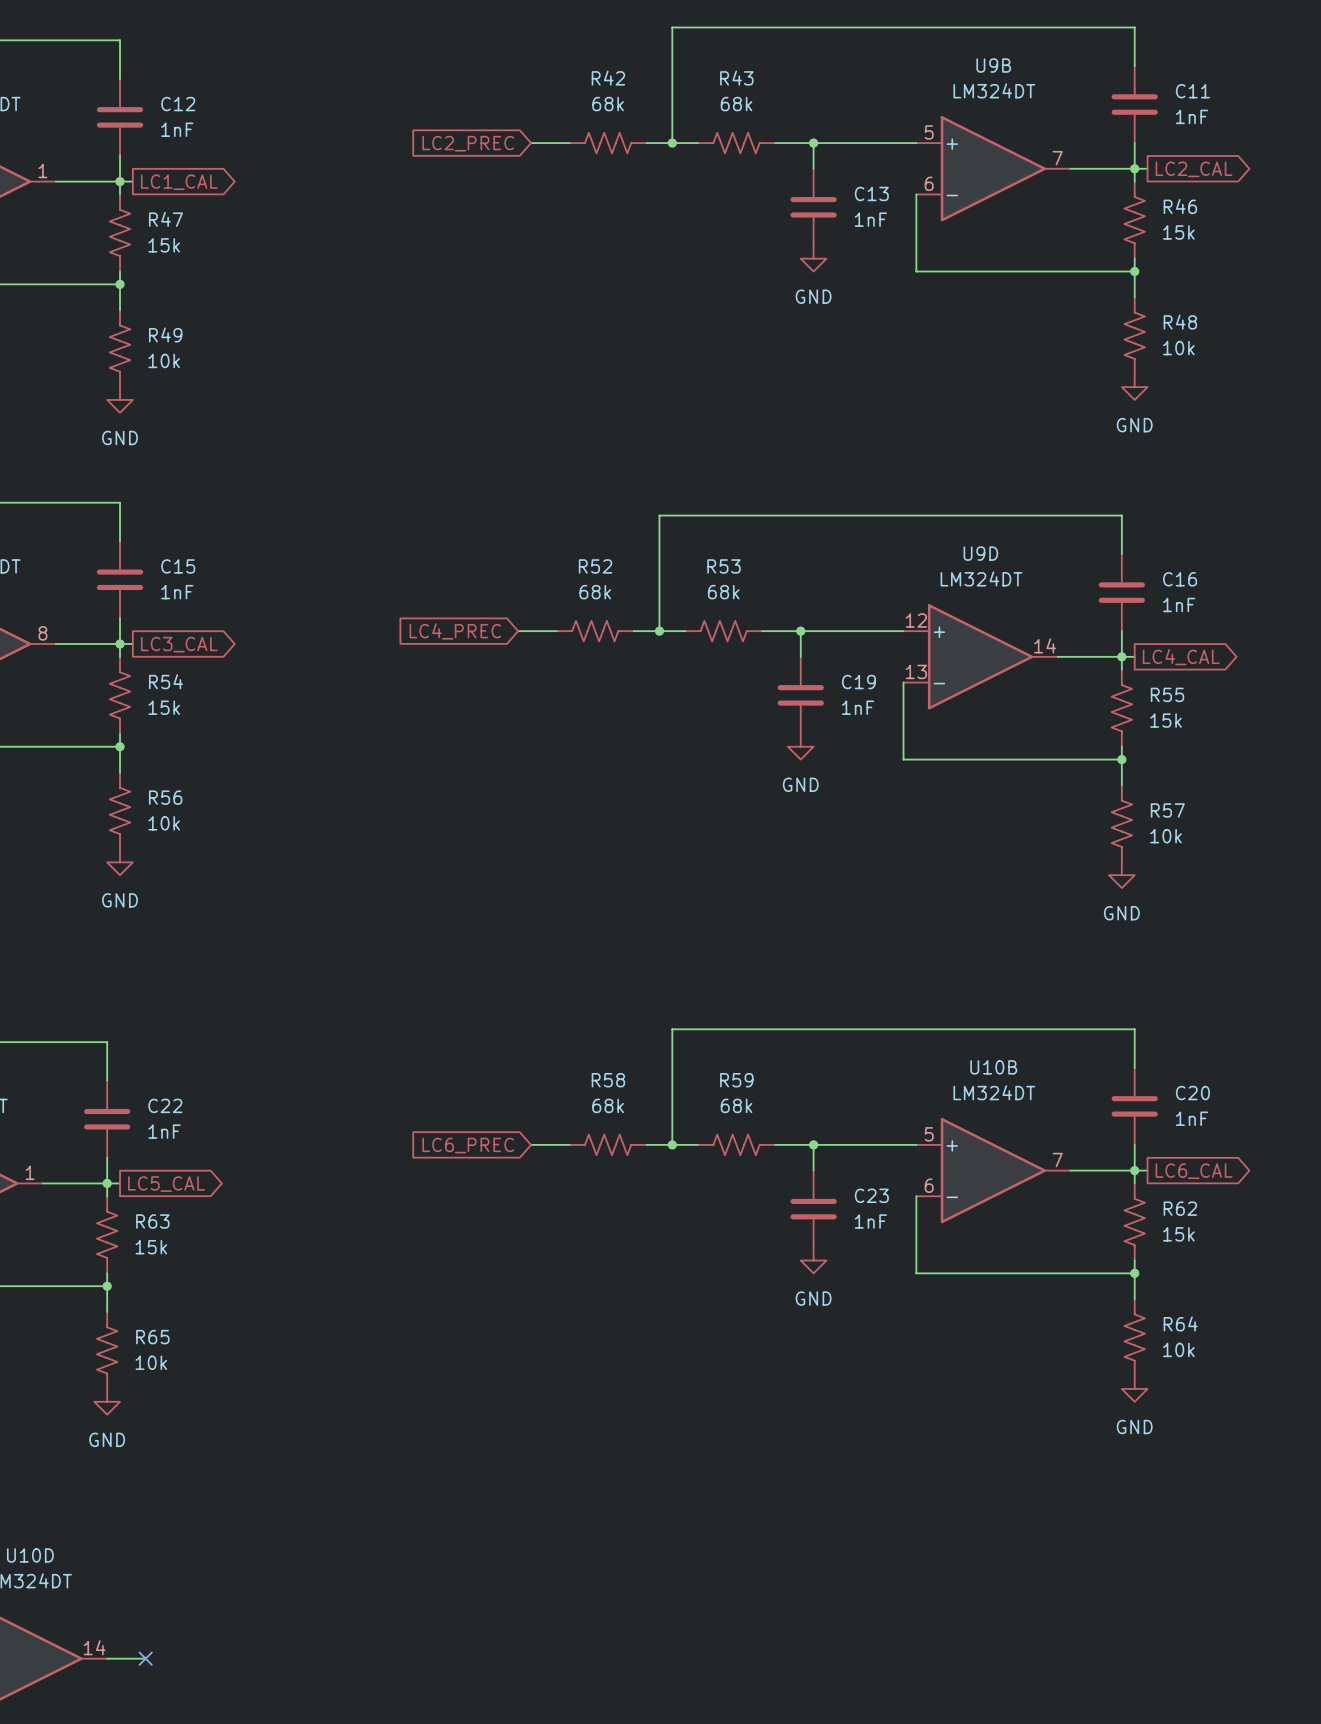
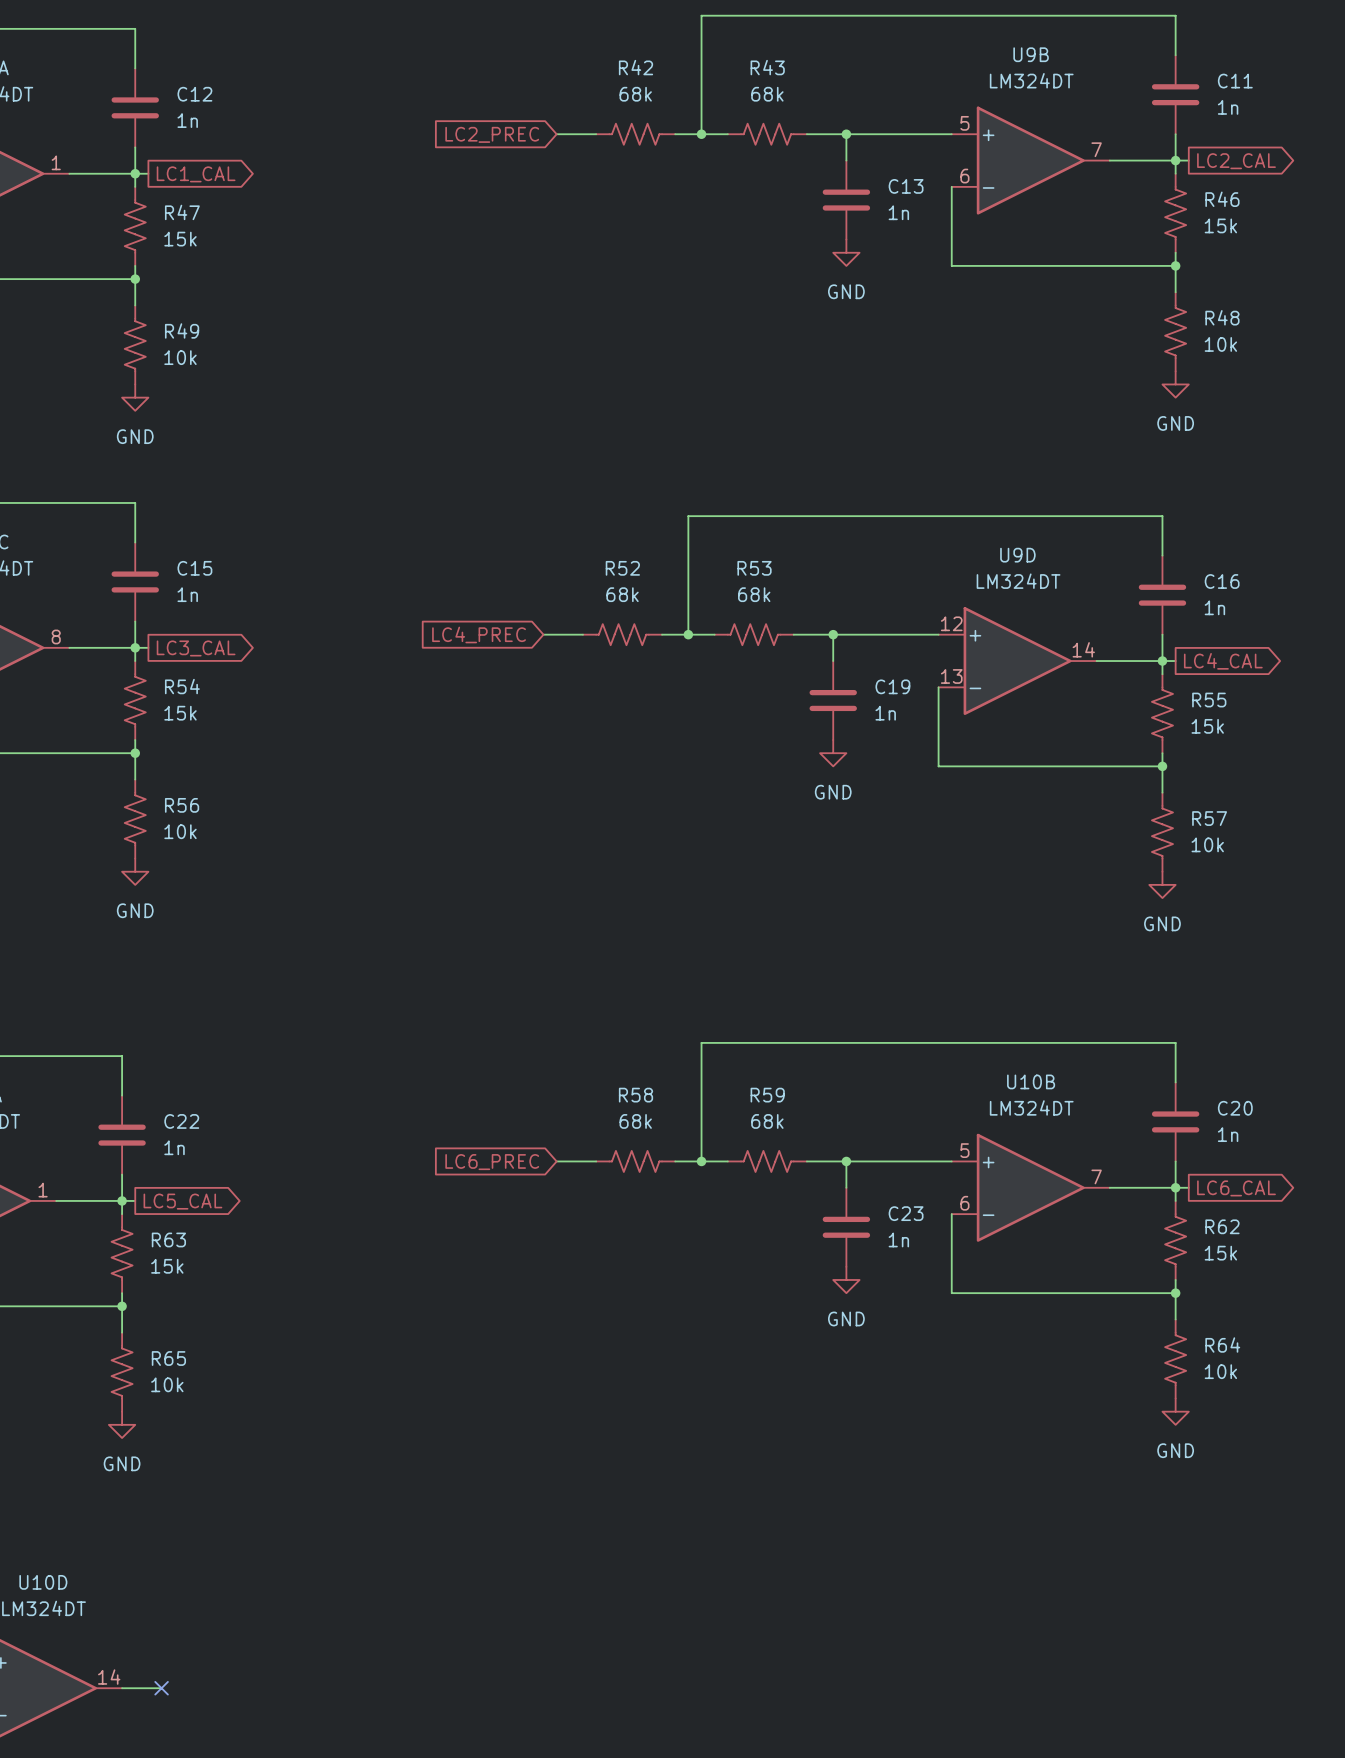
C11 value: 1nF (1191, 116) -> 1n (1228, 107)
C12 value: 1nF (177, 129) -> 1n (187, 120)
C13 value: 1nF (870, 219) -> 1n (898, 212)
C15 value: 1nF (177, 592) -> 1n (187, 594)
C16 value: 1nF (1179, 604) -> 1n (1214, 607)
C19 value: 1nF (858, 707) -> 1n (885, 713)
C20 value: 1nF (1191, 1118) -> 1n (1228, 1134)
C22 value: 1nF (164, 1131) -> 1n (174, 1147)
C23 value: 1nF (870, 1221) -> 1n (898, 1239)

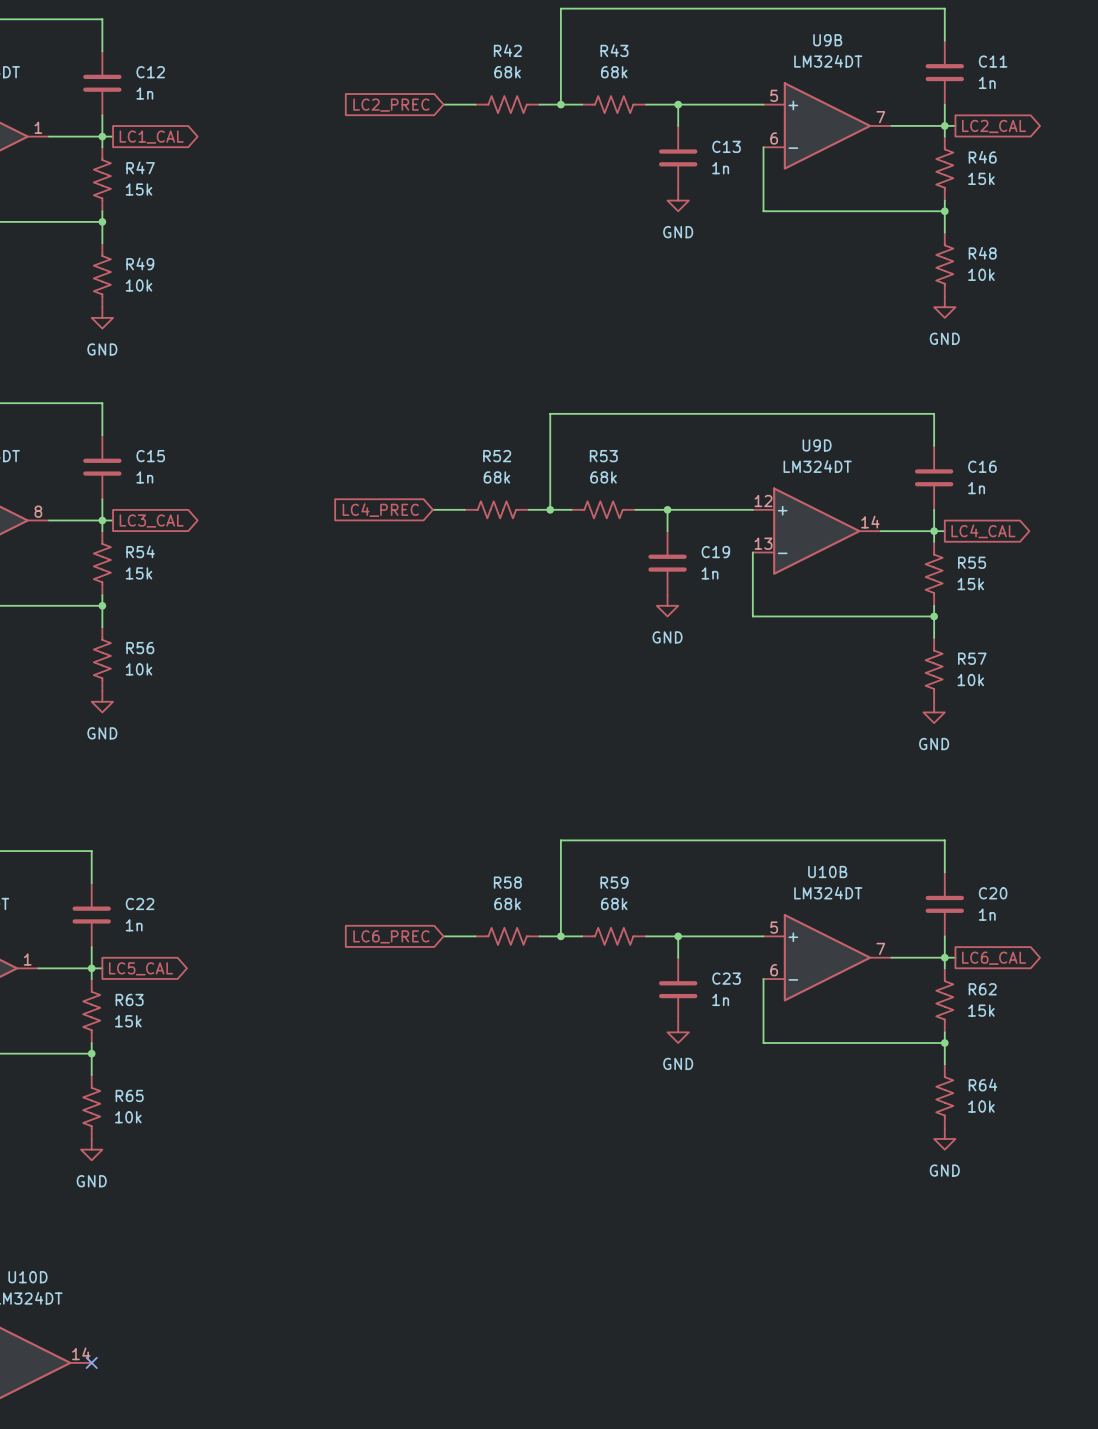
wire: (122, 1688) (161, 1688) -> none
no-connect mark position: (161, 1688) -> (91, 1362)

